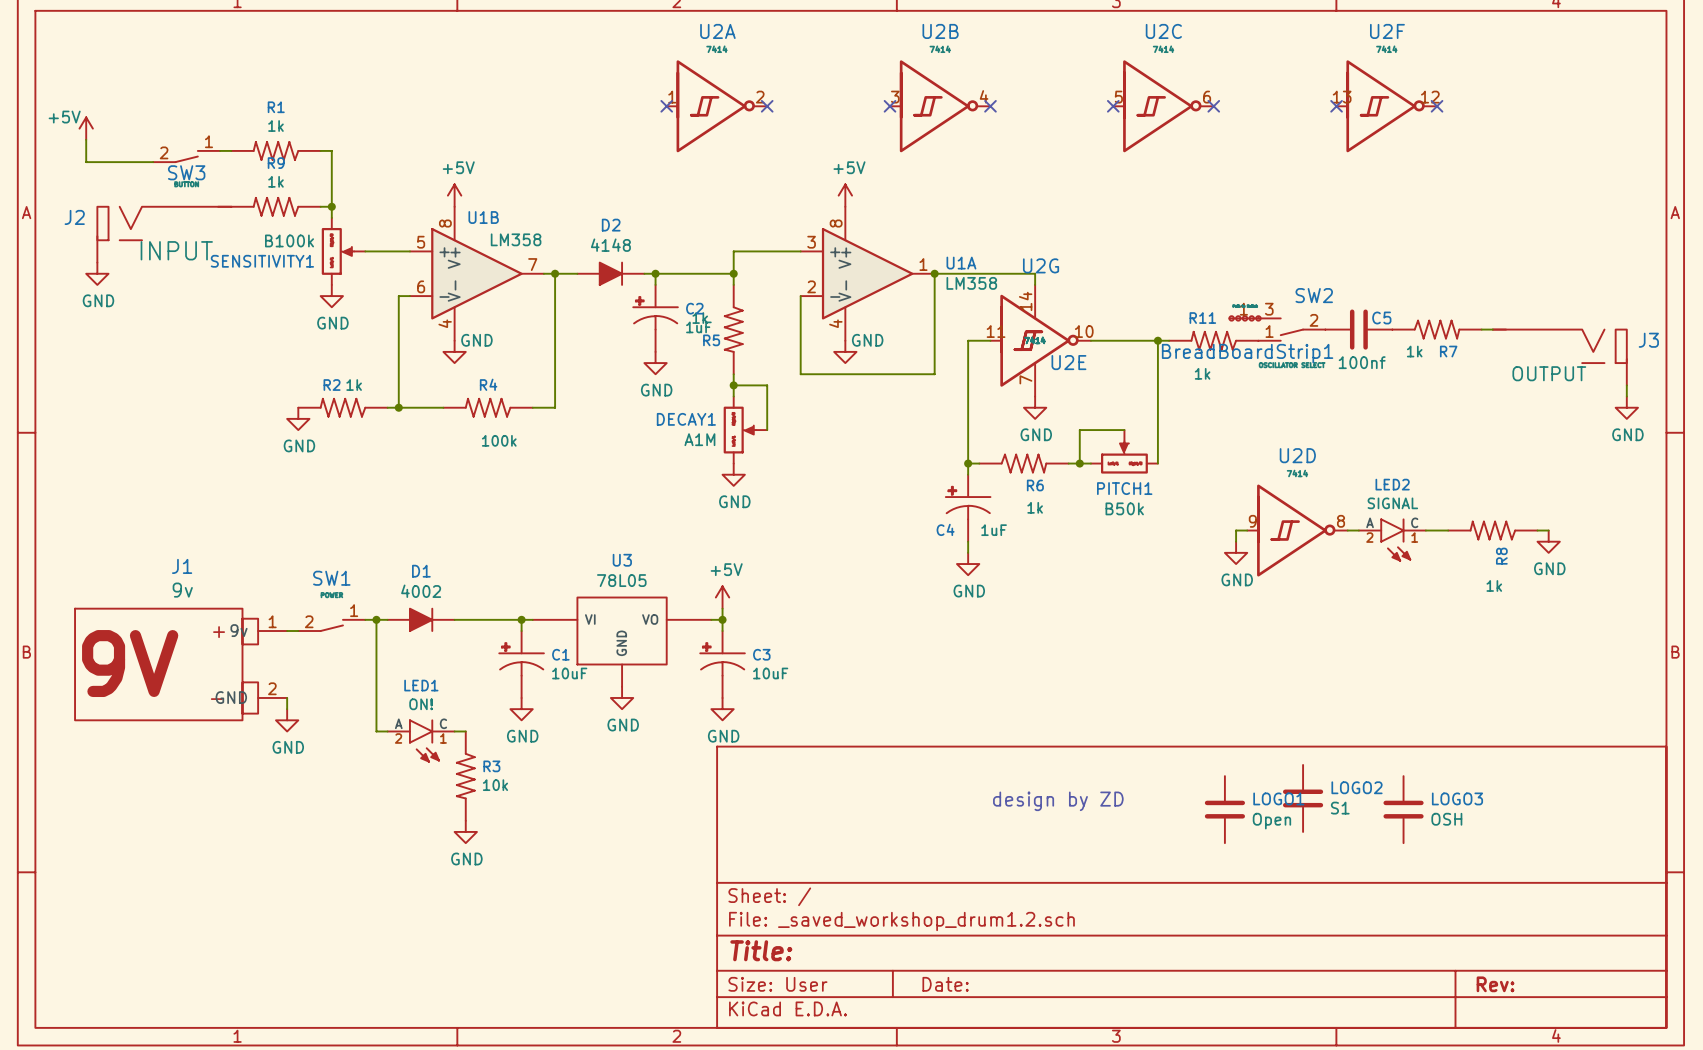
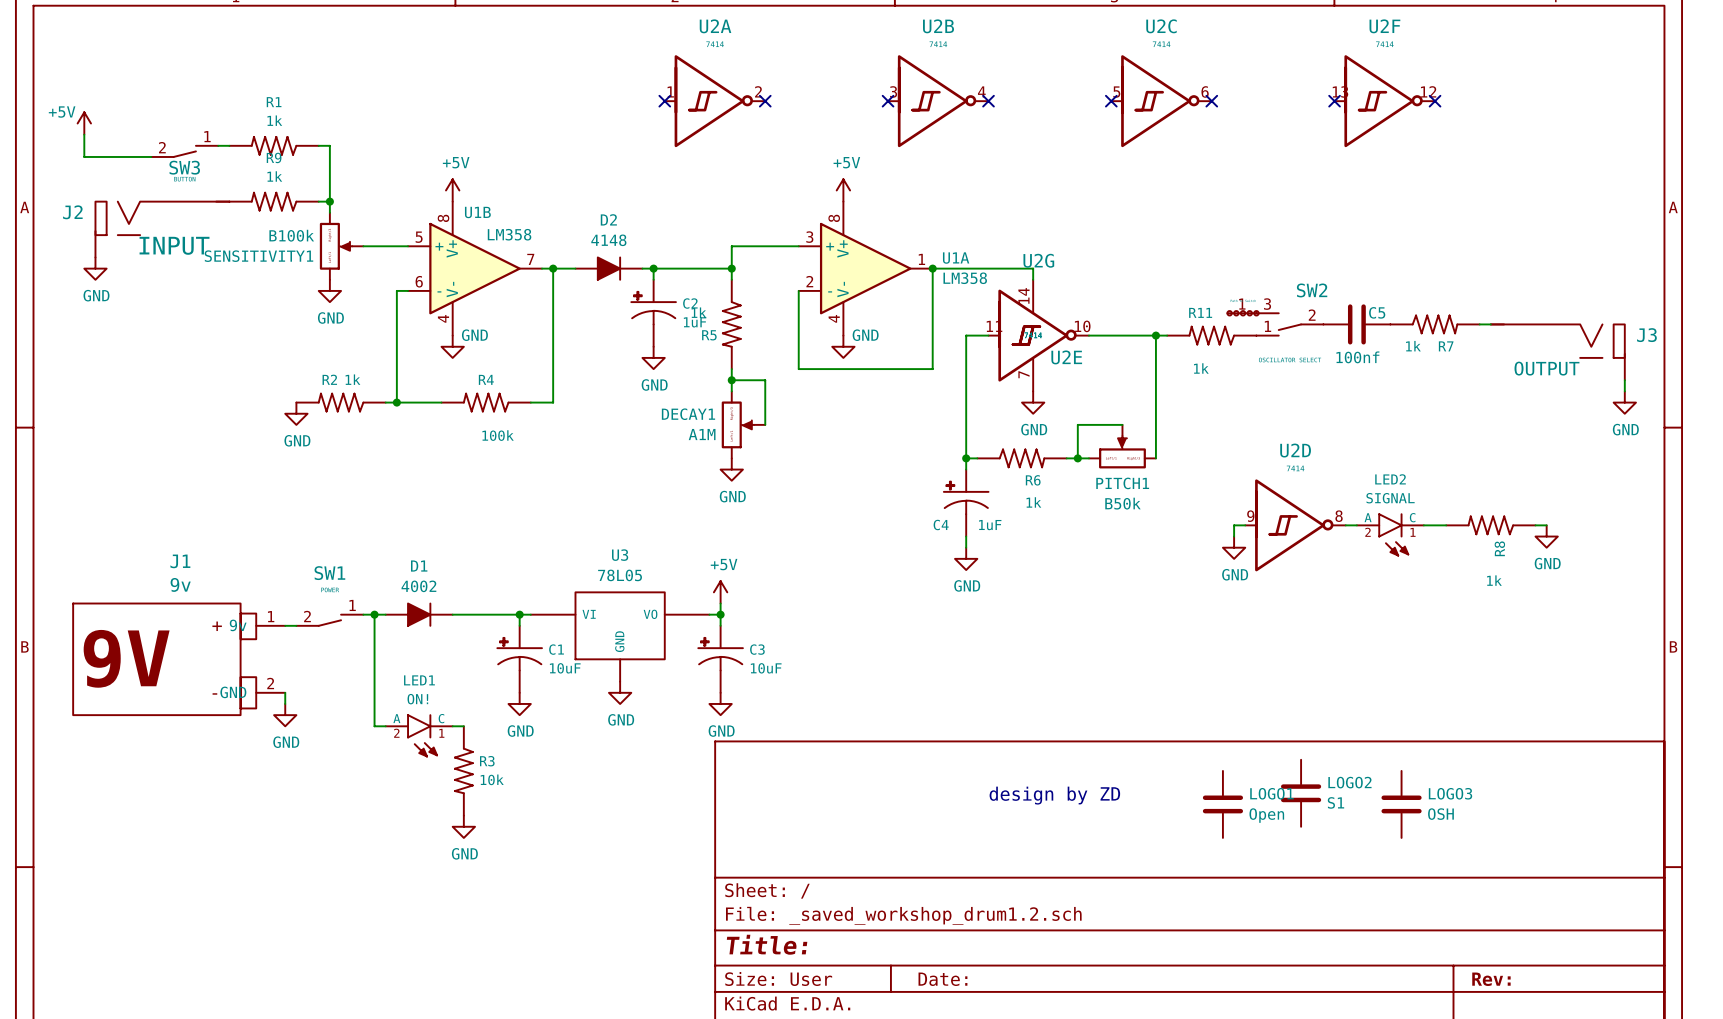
BreadBoardStrip1 name: BreadBoardStrip1 (1247, 353) -> none

